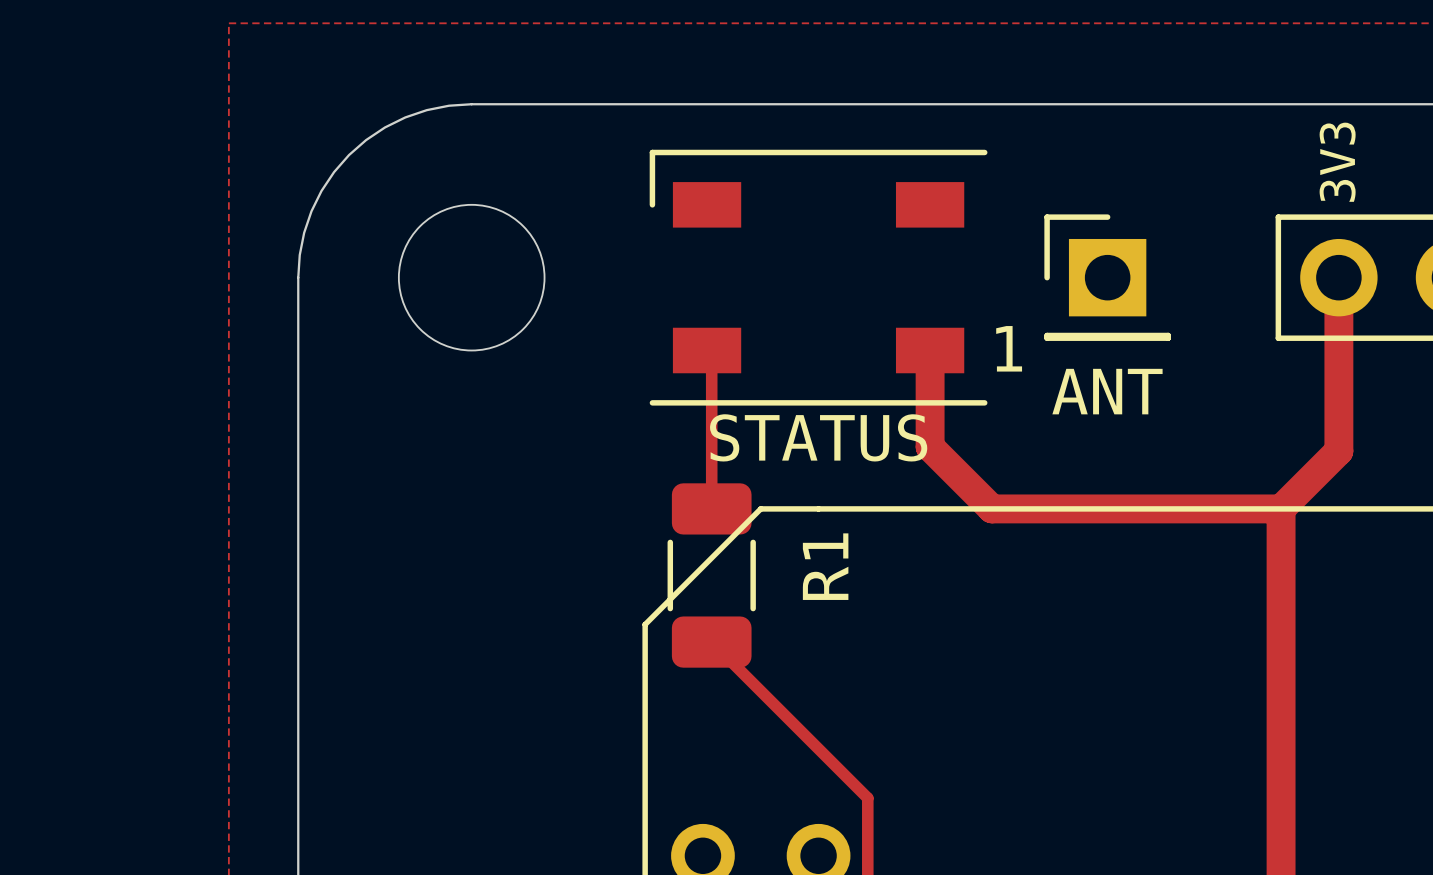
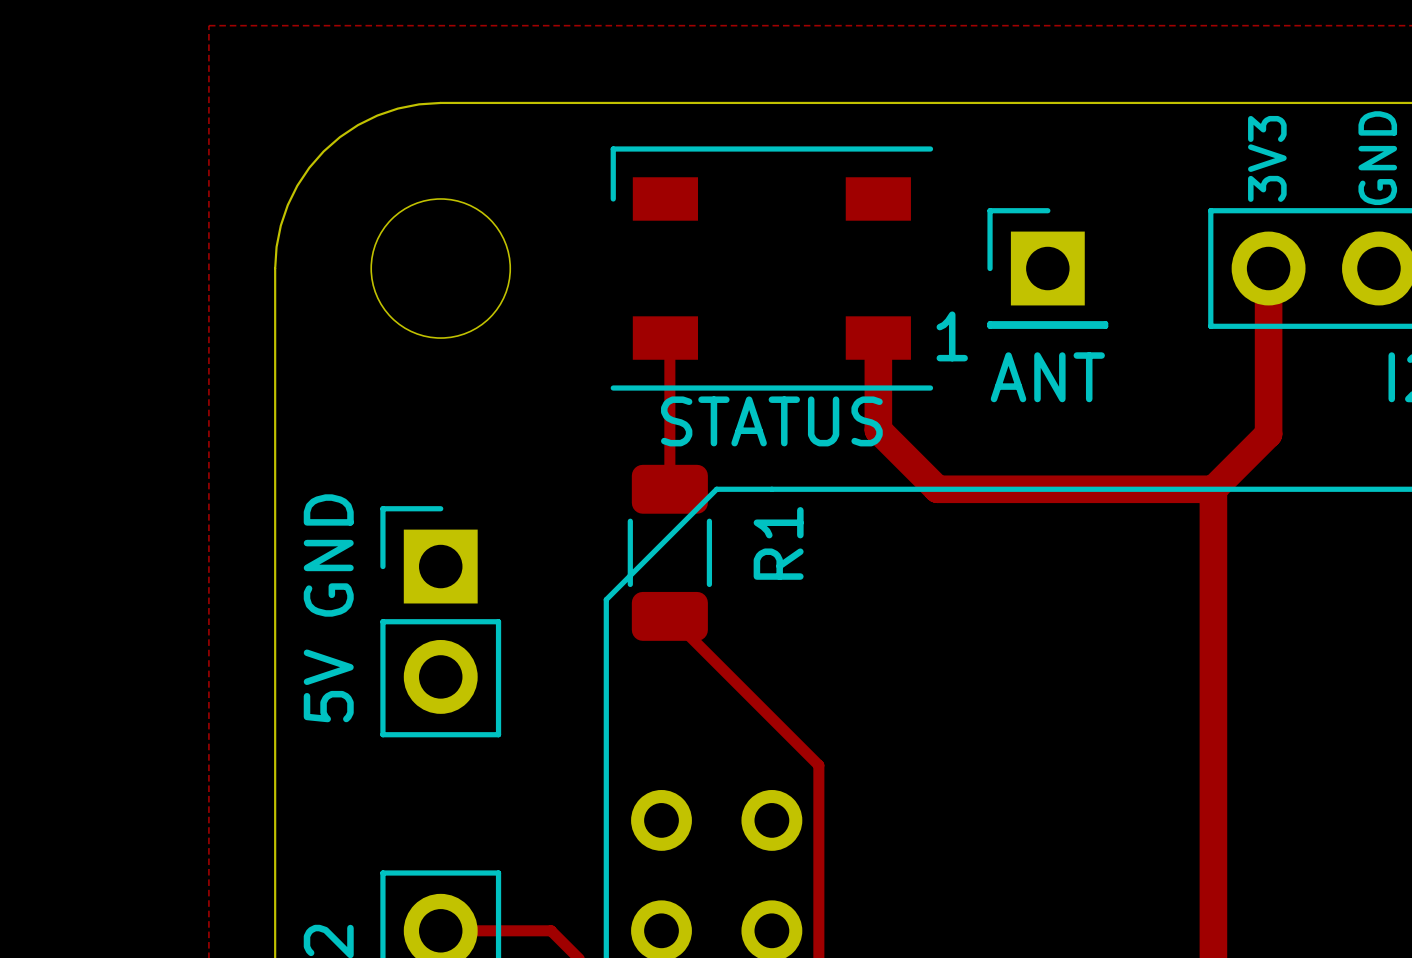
text: none -> GND (328, 555)
part: none -> (440, 621)
text: none -> 5V (328, 685)

